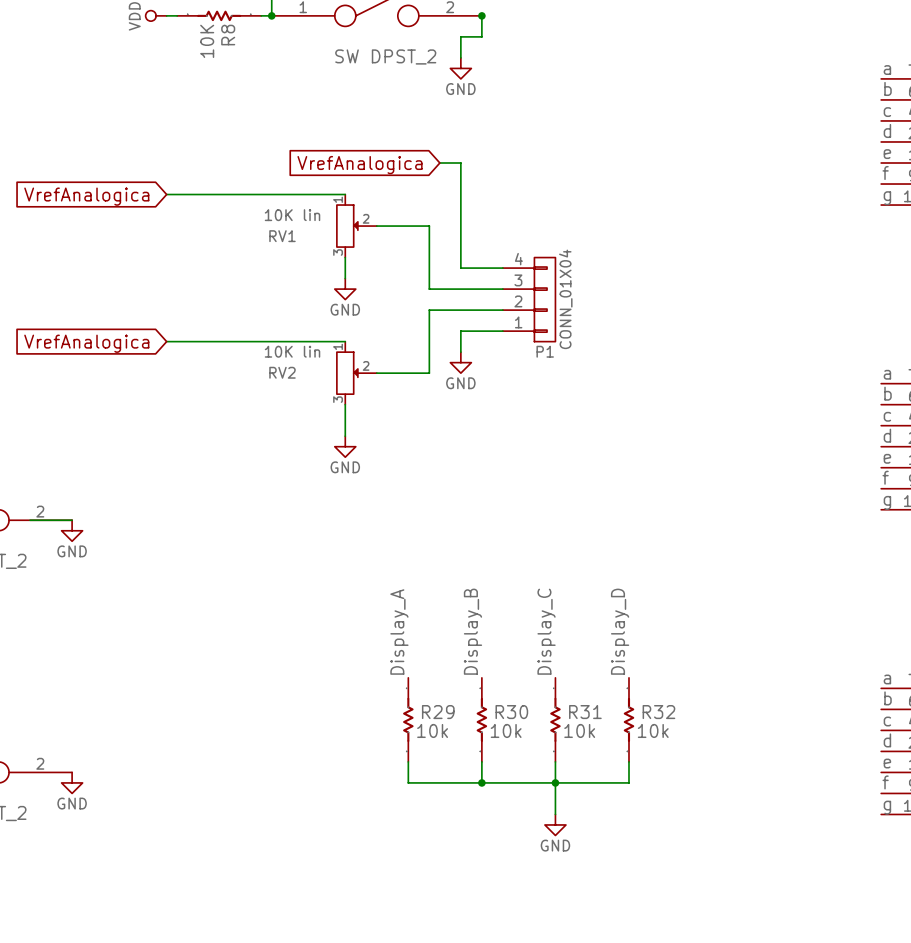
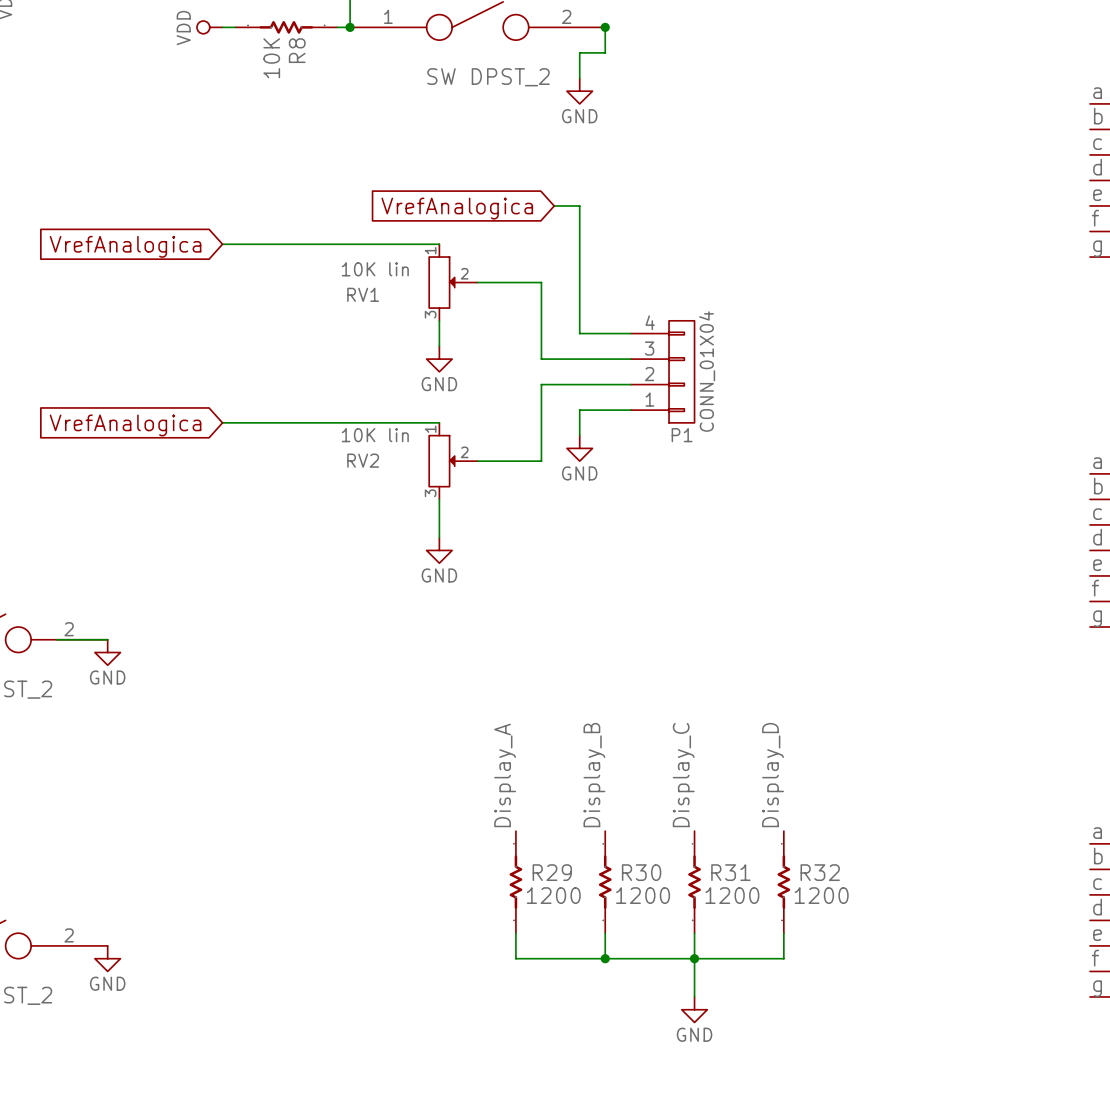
R29 value: 10k (432, 730) -> 1200 (553, 895)
R30 value: 10k (506, 730) -> 1200 (643, 895)
R31 value: 10k (579, 730) -> 1200 (732, 895)
R32 value: 10k (653, 730) -> 1200 (821, 895)

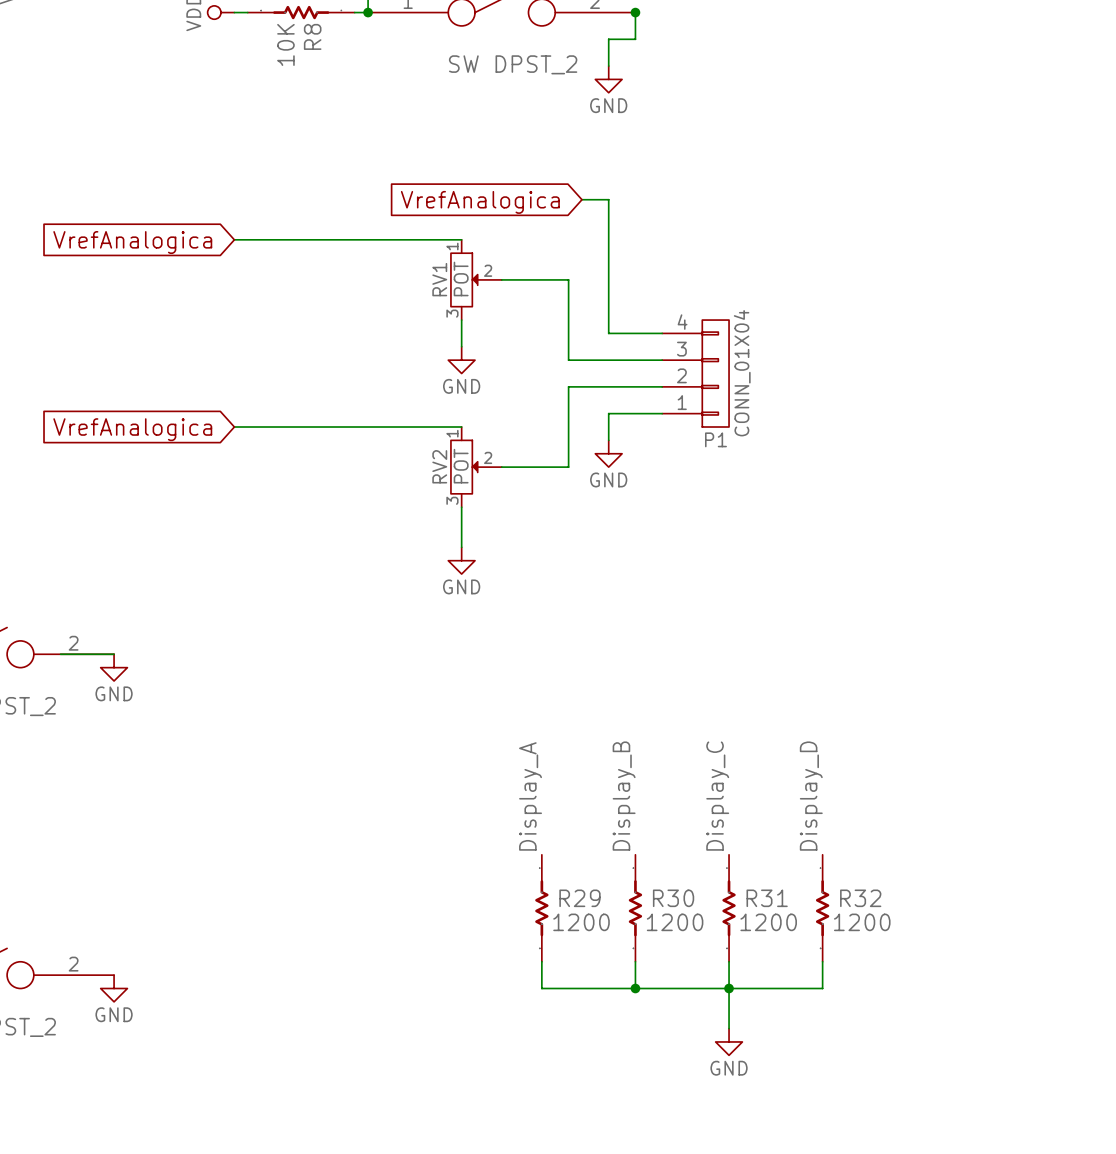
RV1 value: 10K lin (375, 269) -> POT (461, 278)
RV1 name rotation: 0° (363, 294) -> 90° counterclockwise (439, 279)
RV1 name position: RV1 (363, 294) -> RV1 (439, 279)
RV2 value: 10K lin (375, 435) -> POT (461, 466)
RV2 name rotation: 0° (363, 460) -> 90° counterclockwise (439, 466)
RV2 name position: RV2 (363, 460) -> RV2 (439, 466)

